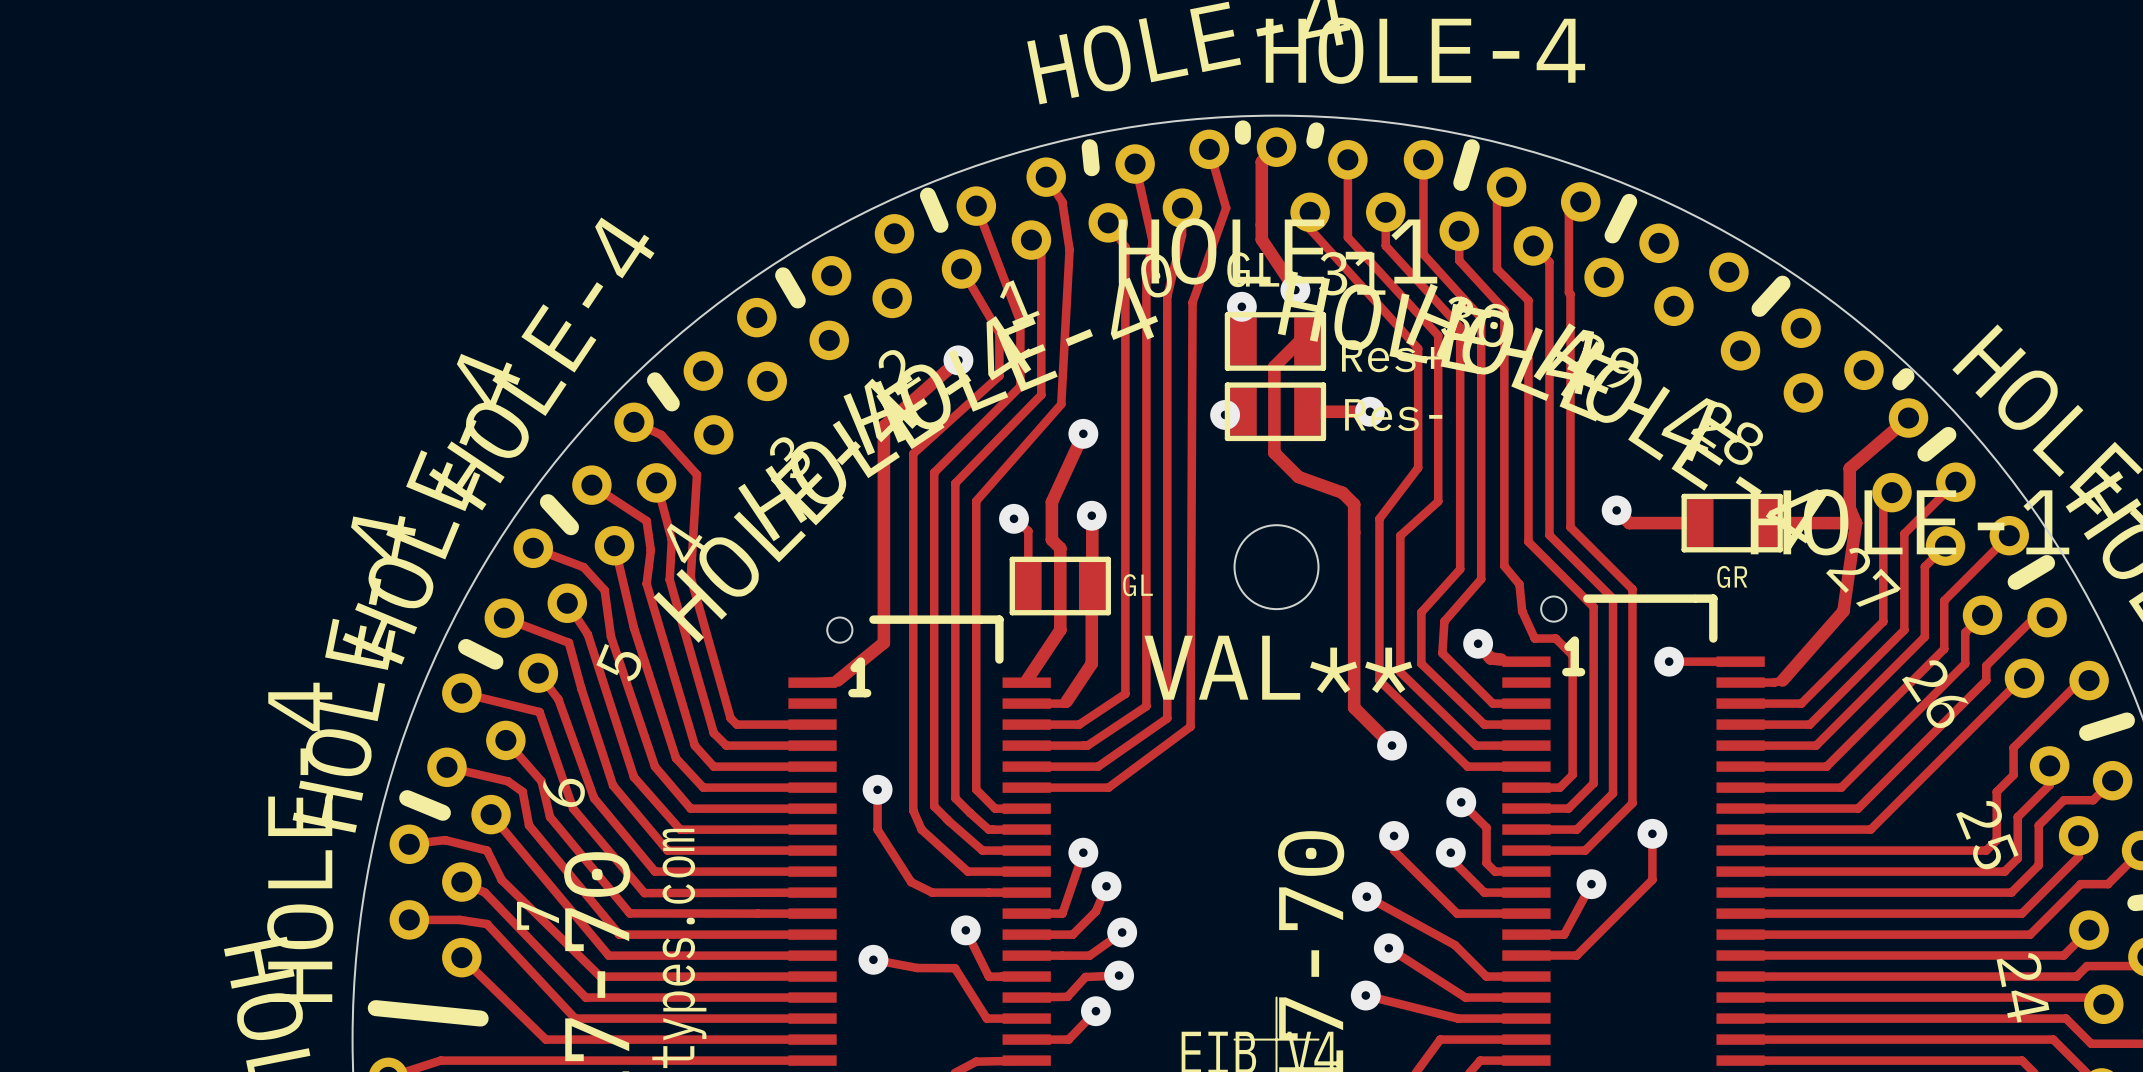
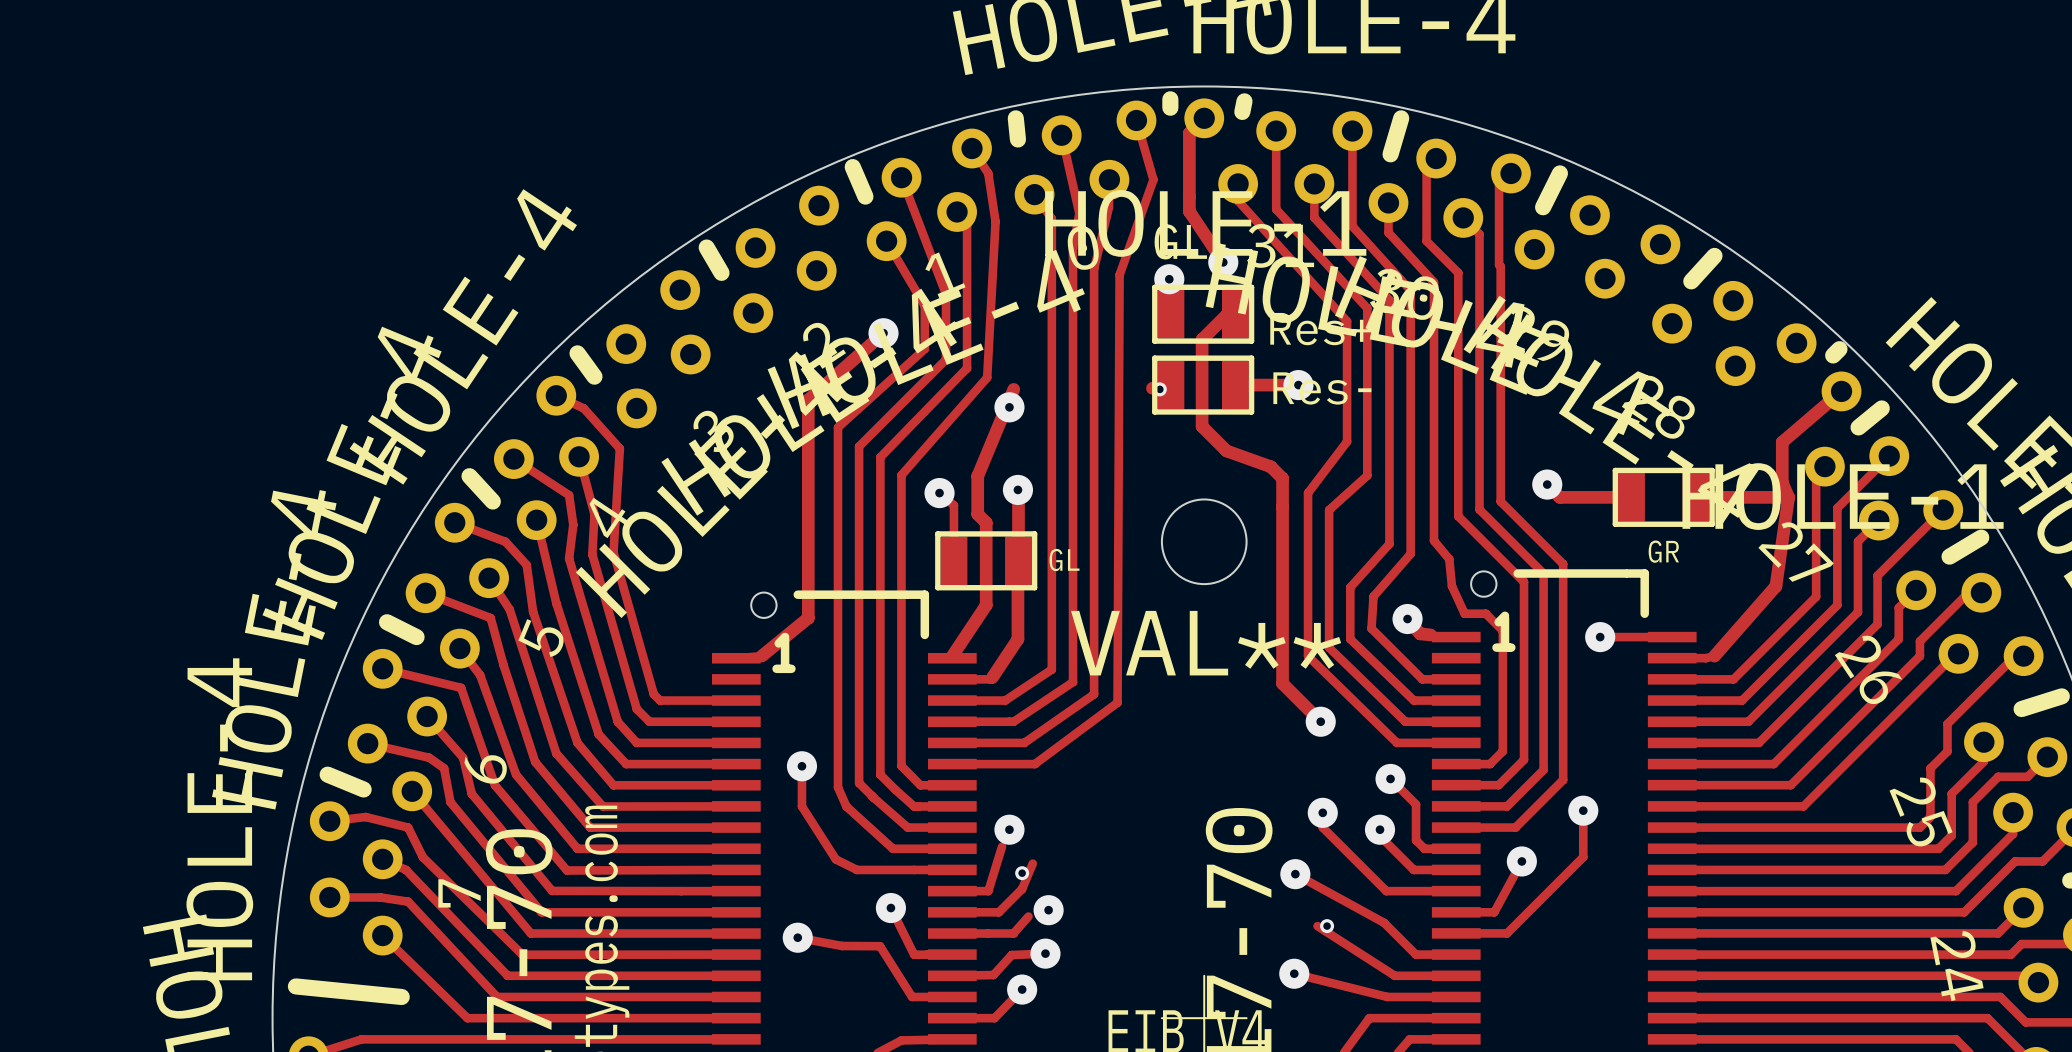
via size: [1210, 400, 1241, 430] -> [1152, 382, 1167, 397]
track: (1083, 433) (1051, 502) -> (1013, 389) (977, 476)
track: (1083, 852) (1062, 913) -> (1002, 846) (988, 891)
via size: [1091, 871, 1122, 902] -> [1015, 866, 1030, 881]
track: (1122, 932) (1087, 955) -> (1028, 916) (1013, 933)
via size: [1373, 933, 1404, 964] -> [1320, 919, 1335, 934]

